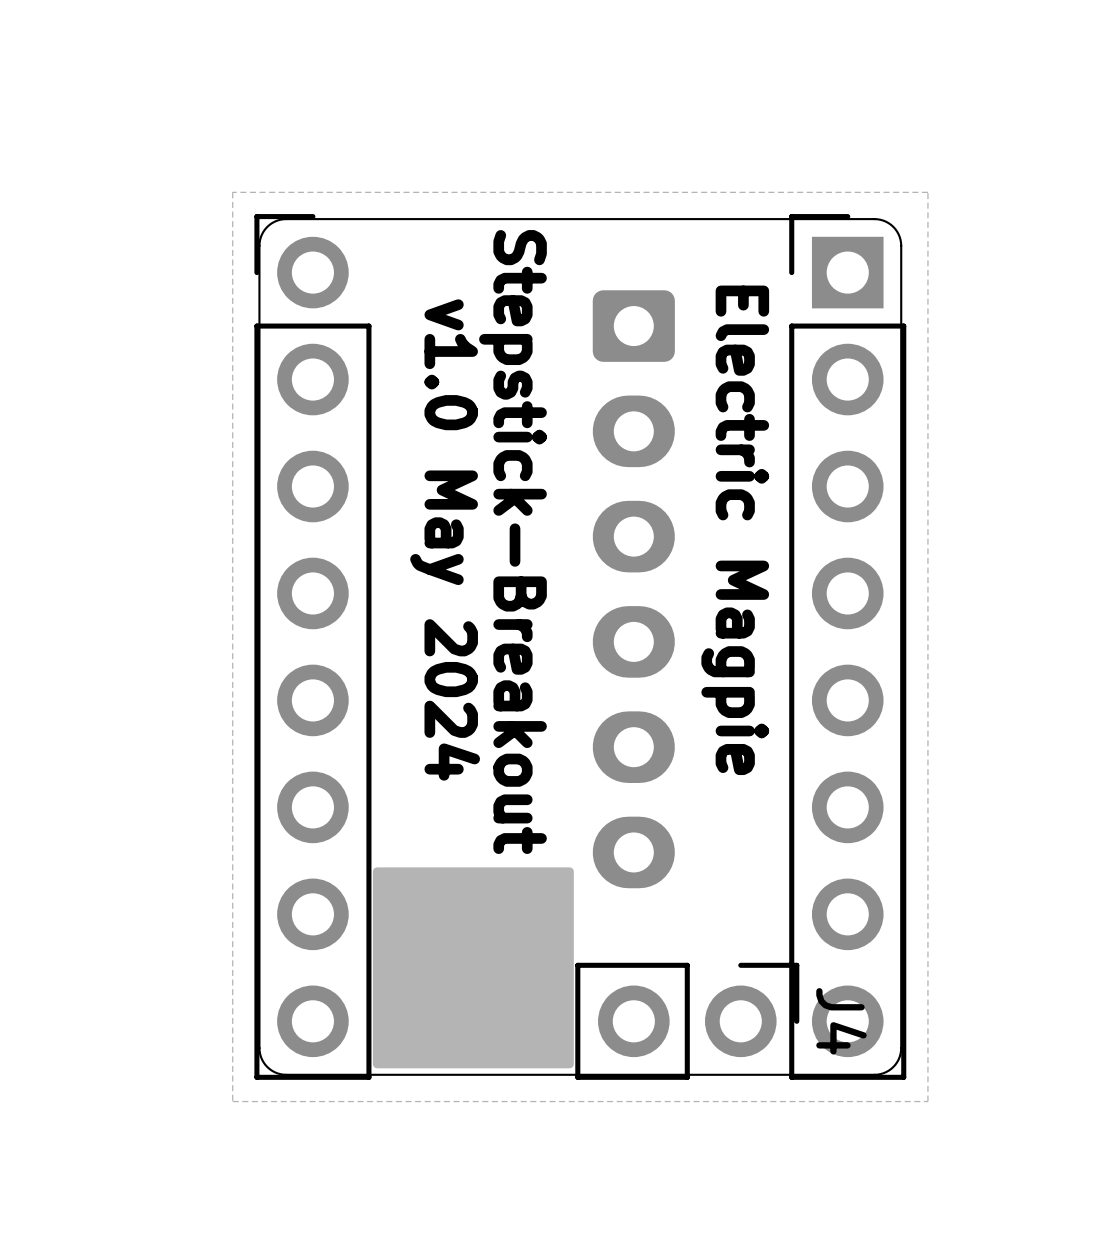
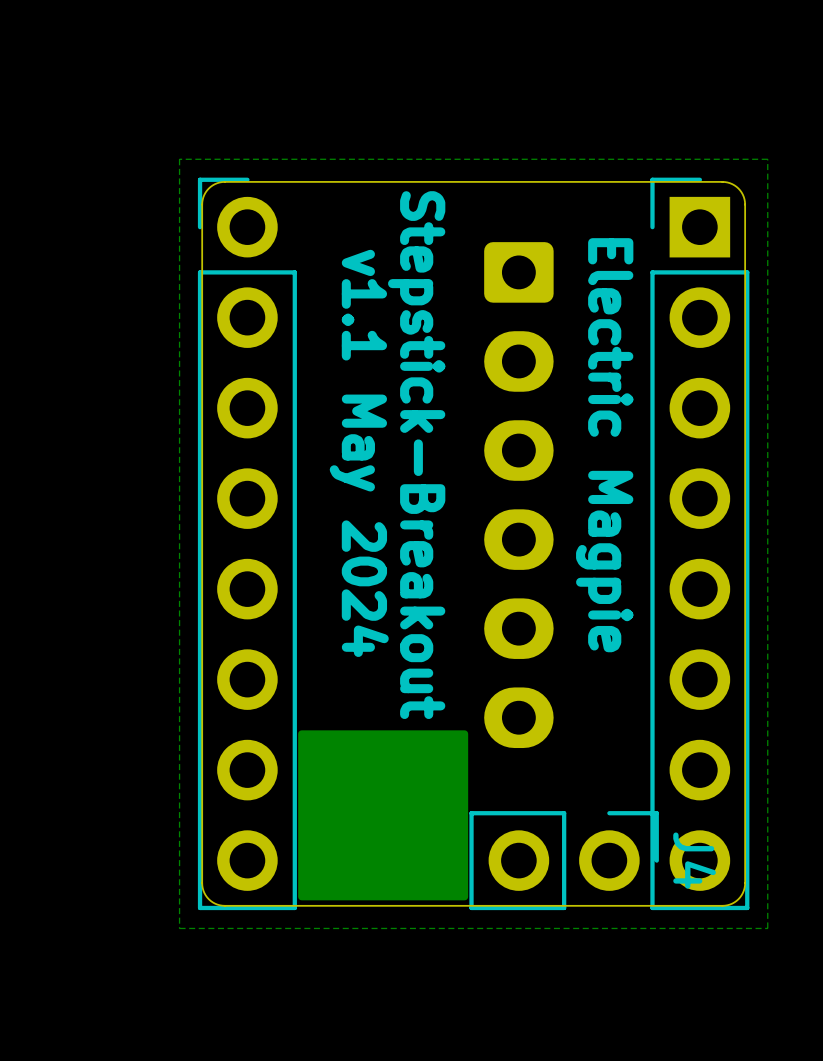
text: v1.0 May 2024 (445, 539) -> v1.1 May 2024 (359, 453)

